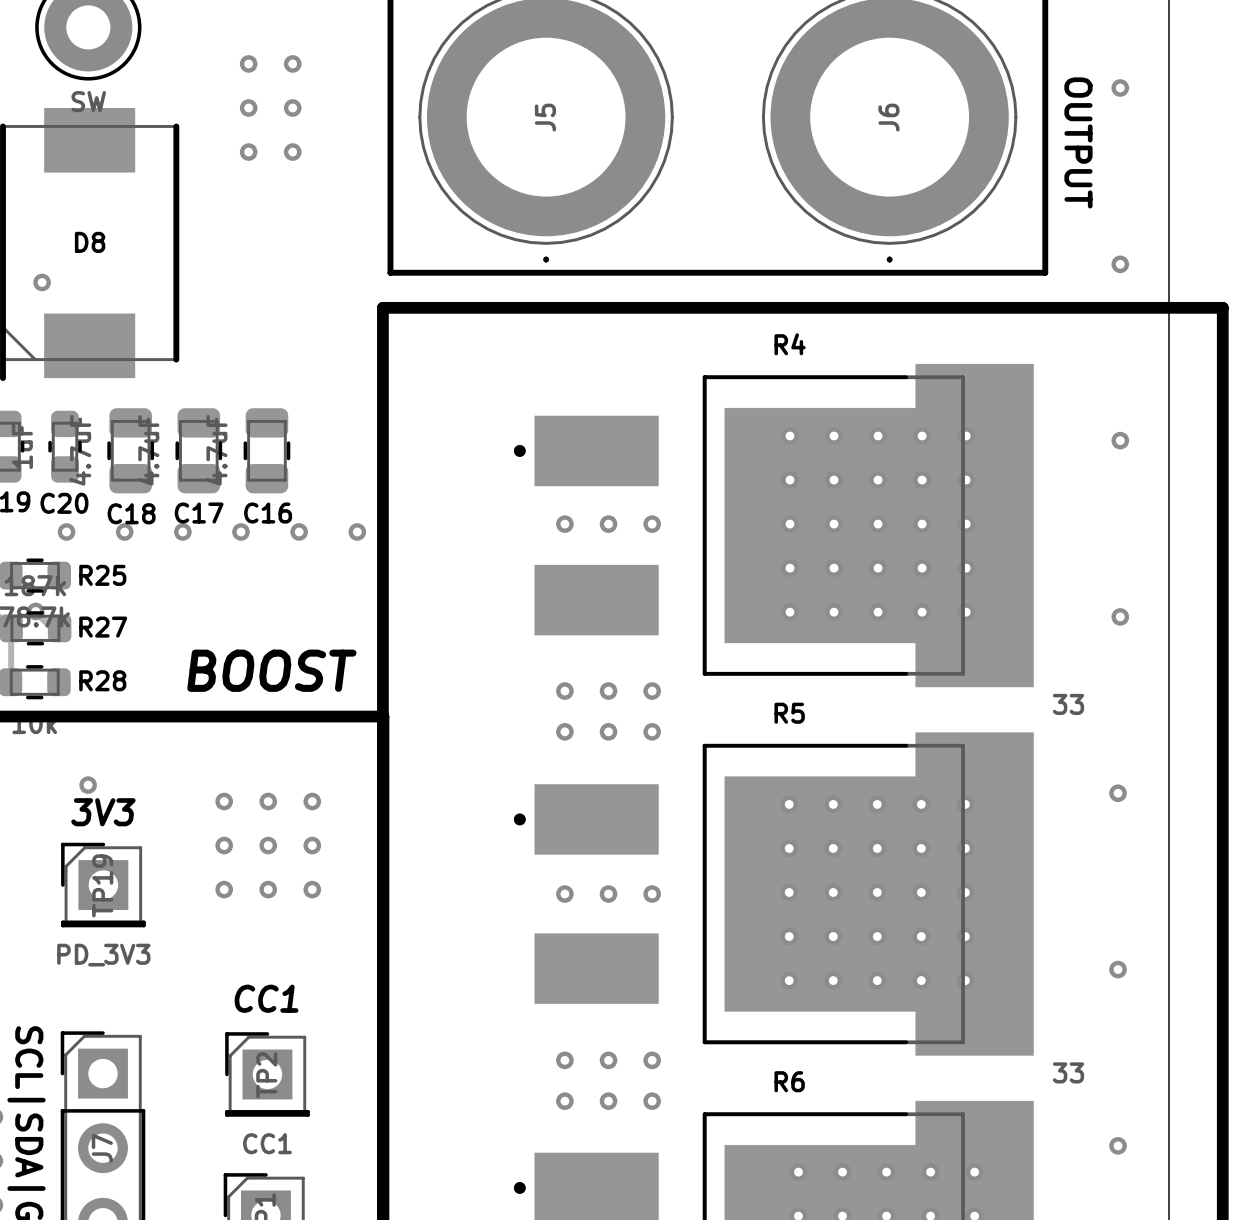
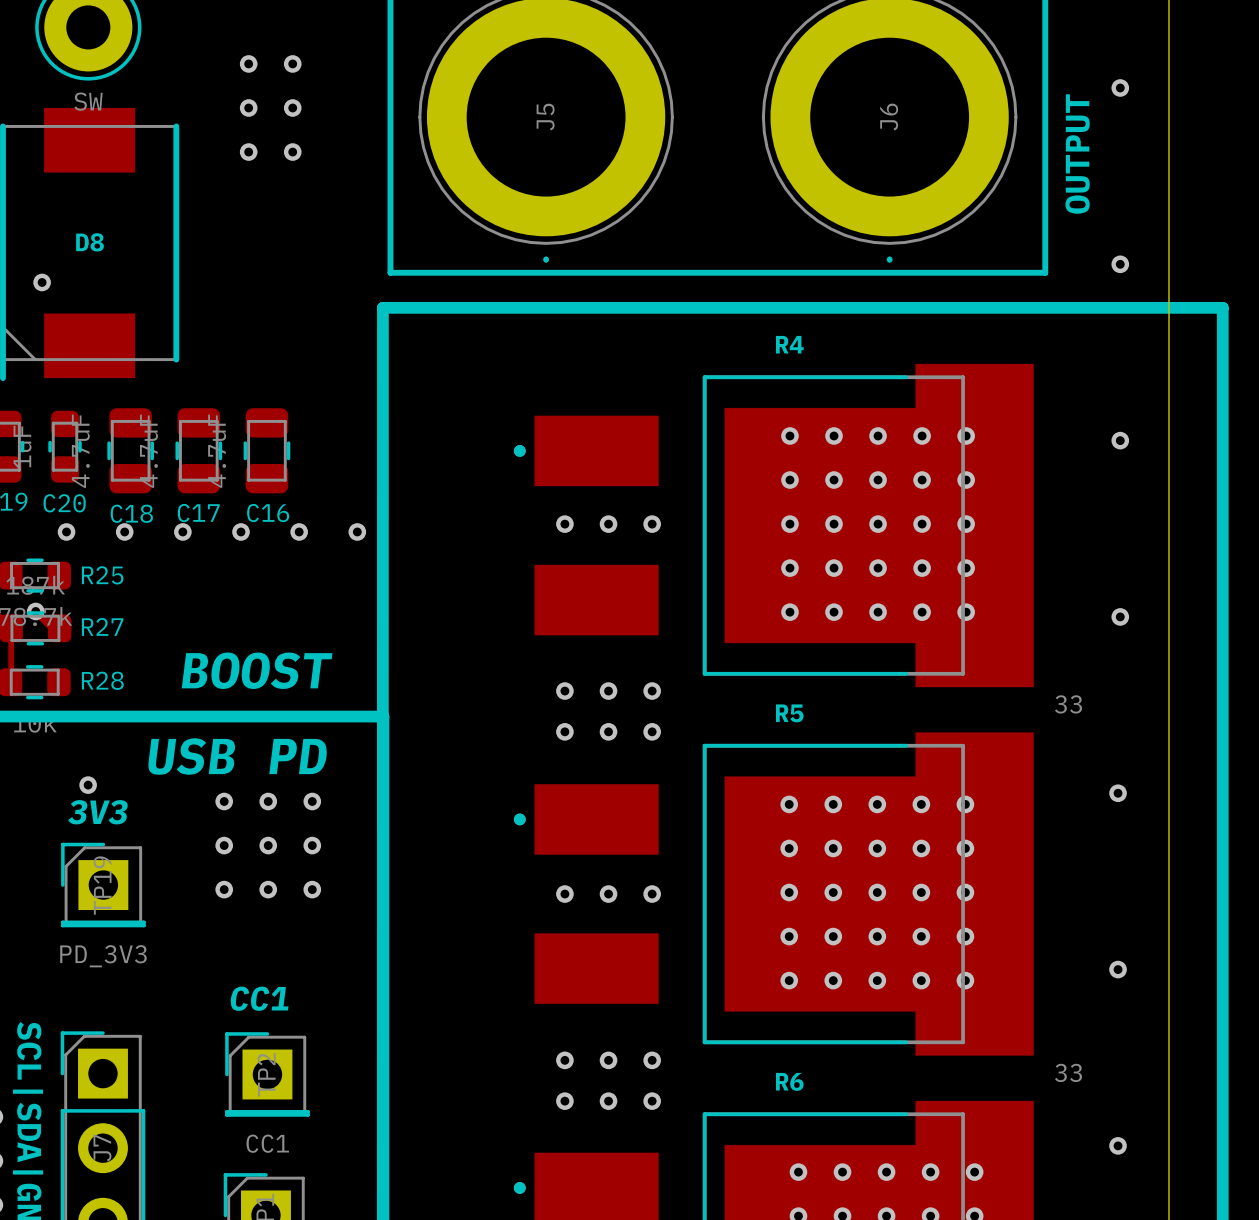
text rotation: 0° (1078, 142) -> 180° (1077, 154)
text: none -> USB PD (237, 756)

